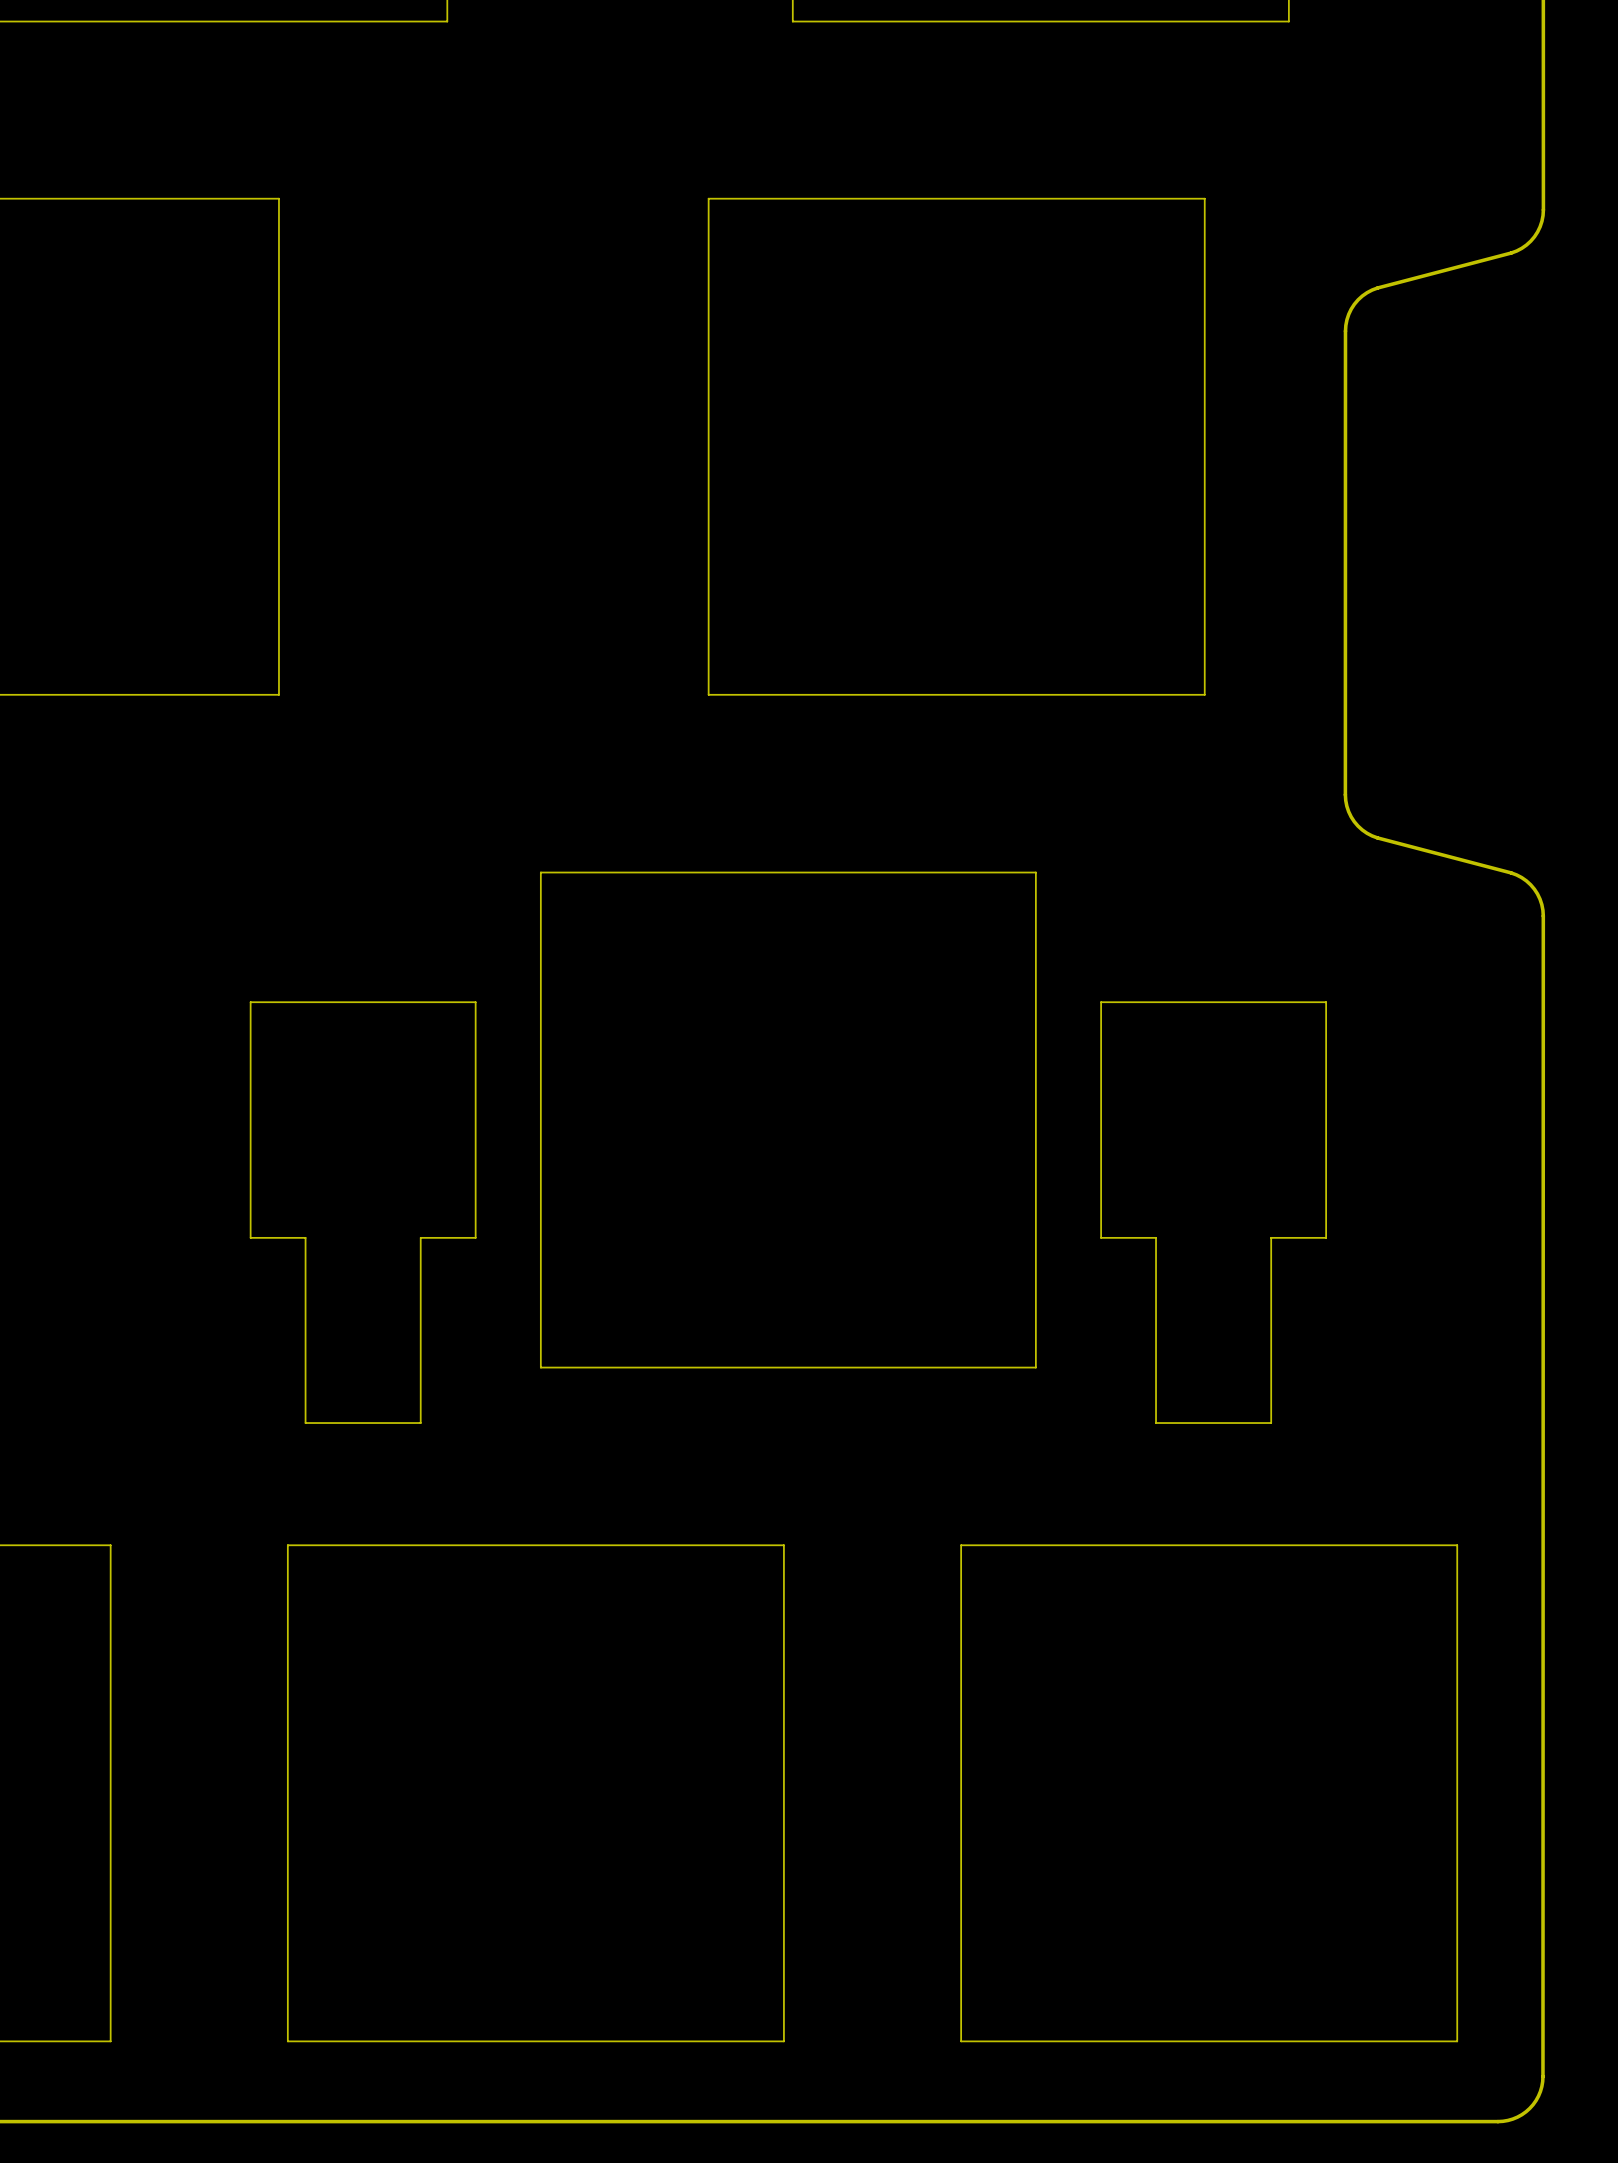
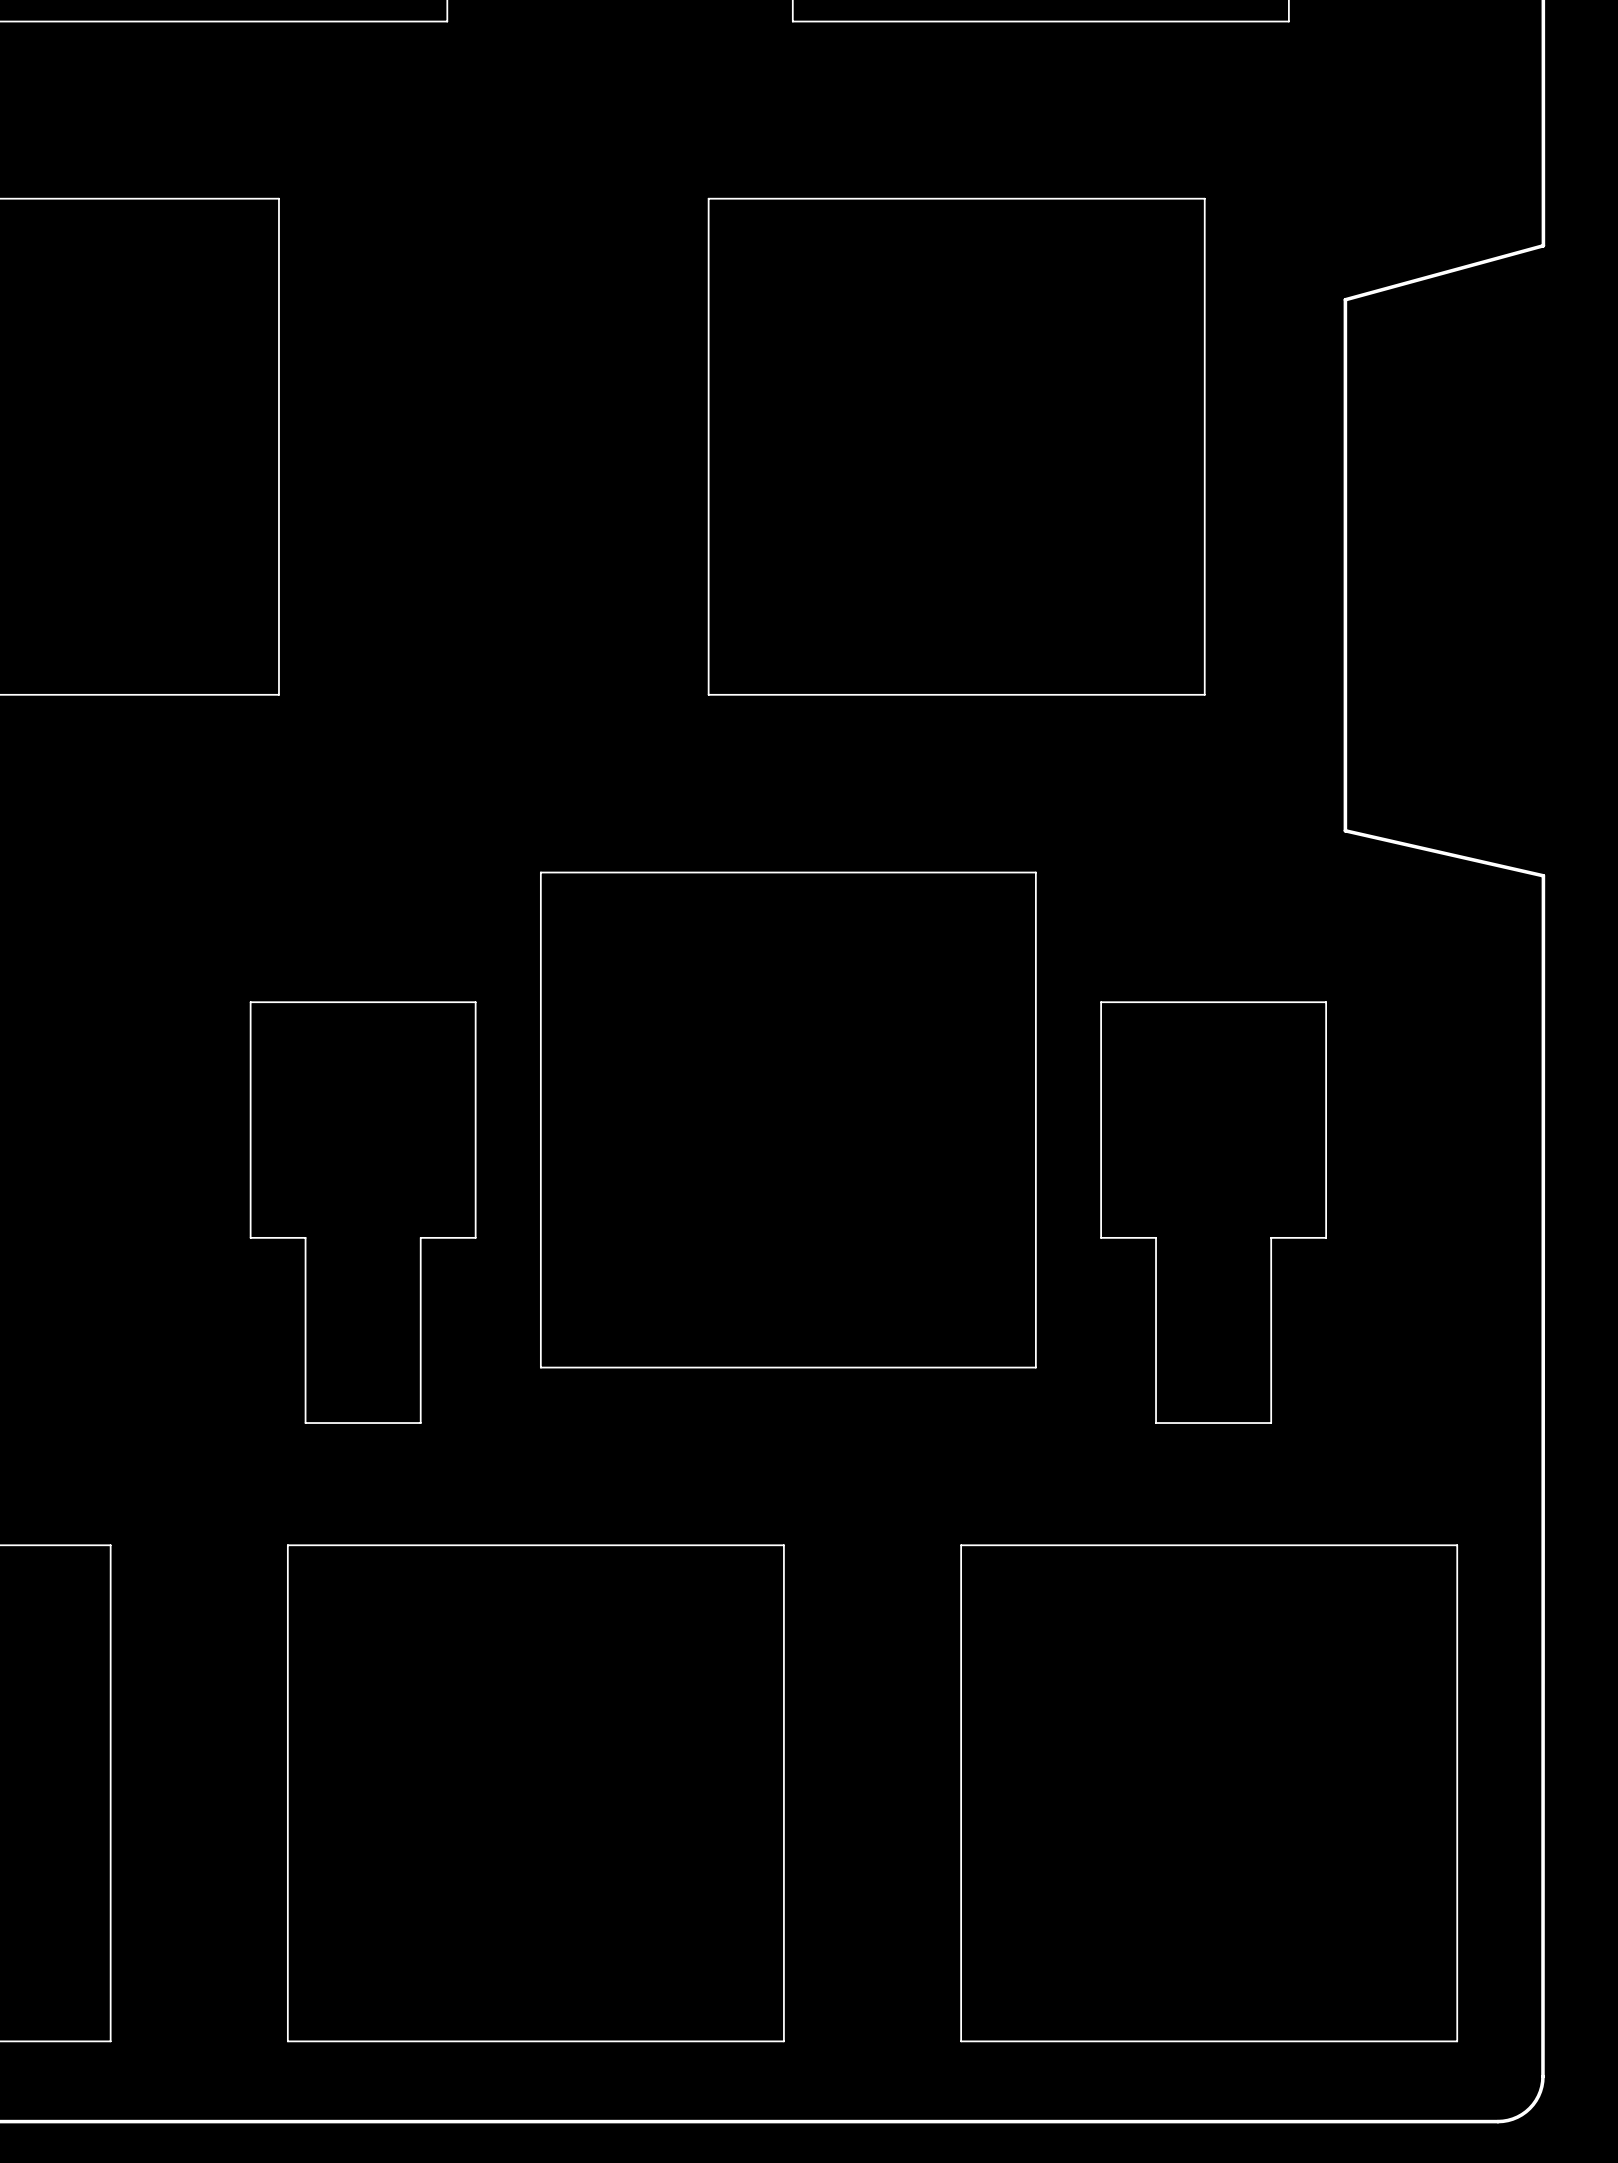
board edge: (1543, 209) (1537, 231) (1521, 248) (1511, 253) (1372, 290) (1362, 296) (1351, 309) (1345, 331) (1345, 794) (1348, 811) (1358, 826) (1372, 835) (1516, 874) (1534, 889) (1542, 910) (1542, 2076) -> (1543, 209) (1543, 245) (1345, 299) (1345, 830) (1543, 875) (1542, 2076)

